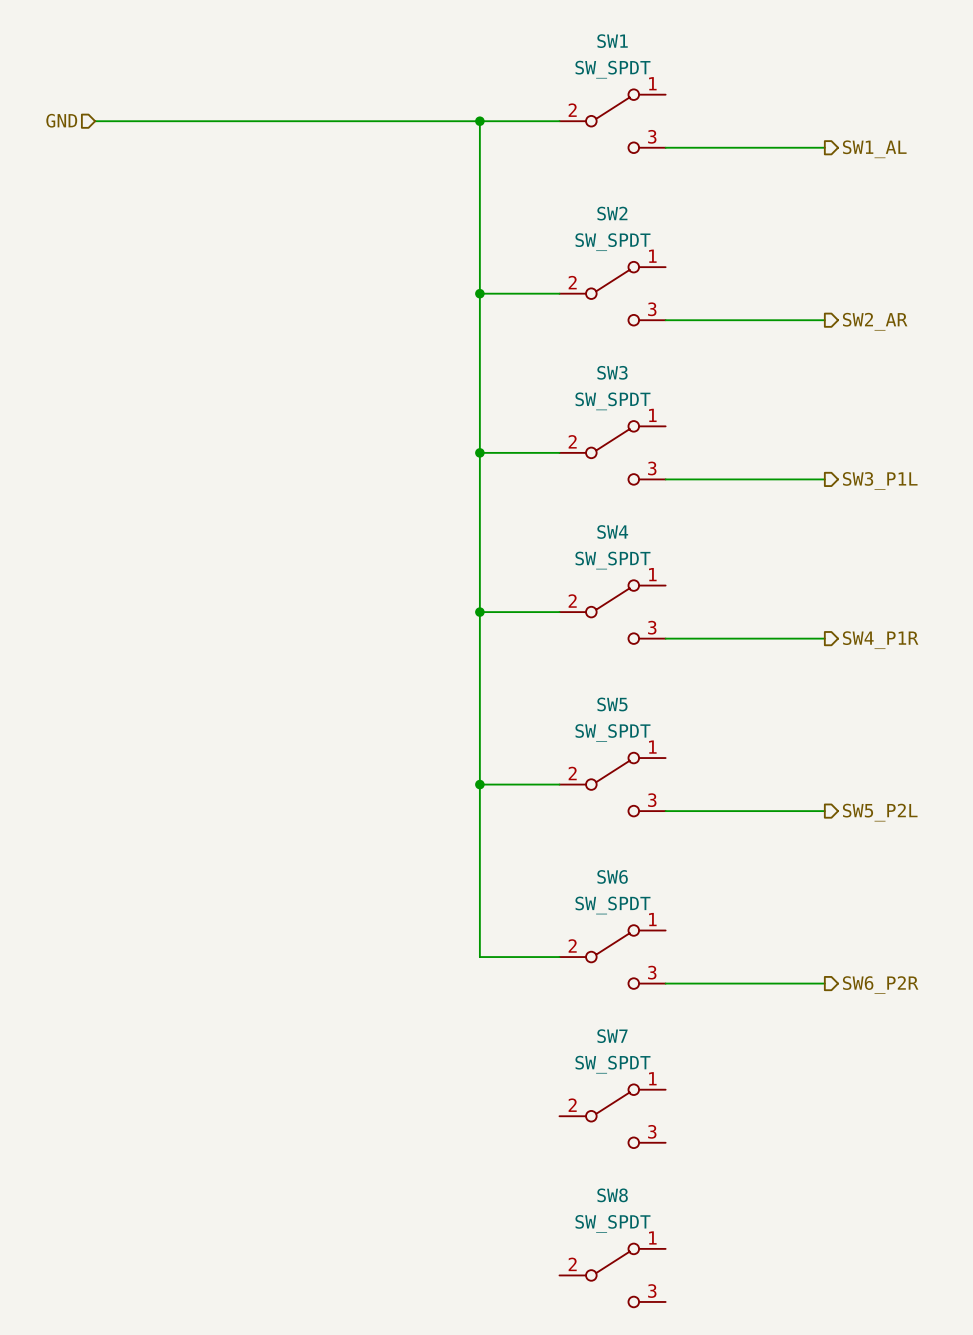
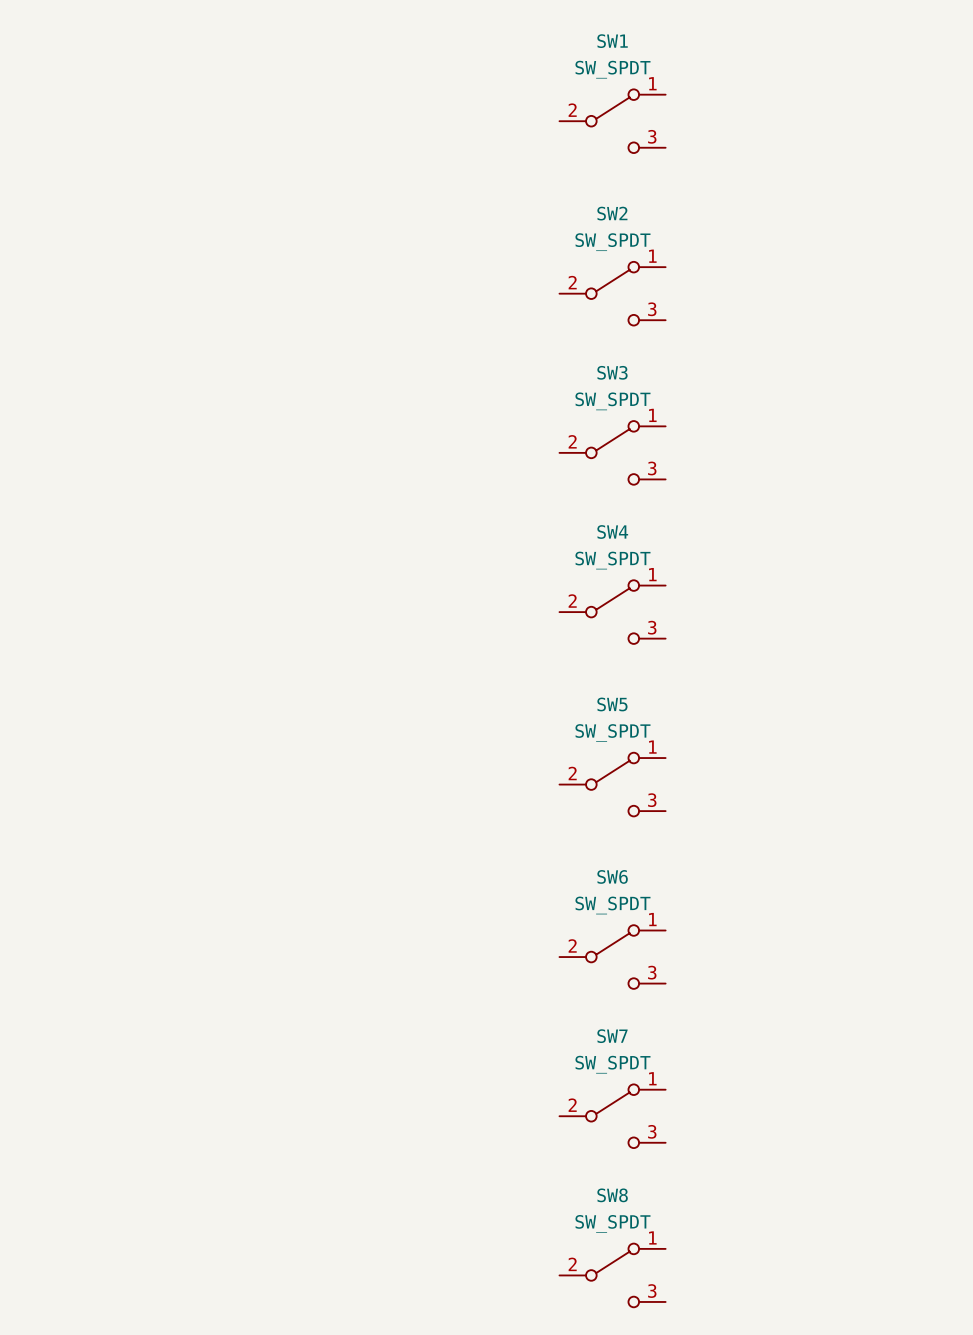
hierarchical label: GND (61, 120) -> none
wire: (95, 121) (559, 121) -> none
wire: (479, 121) (479, 957) (559, 957) -> none
junction: (479, 121) -> none
wire: (665, 147) (824, 147) -> none
hierarchical label: SW1_AL (874, 149) -> none
wire: (479, 293) (559, 293) -> none
junction: (479, 293) -> none
wire: (665, 320) (824, 320) -> none
hierarchical label: SW2_AR (875, 321) -> none
wire: (479, 452) (559, 452) -> none
junction: (479, 452) -> none
wire: (665, 479) (824, 479) -> none
hierarchical label: SW3_P1L (880, 480) -> none
wire: (479, 612) (559, 612) -> none
junction: (479, 612) -> none
wire: (665, 638) (824, 638) -> none
hierarchical label: SW4_P1R (880, 640) -> none
wire: (479, 784) (559, 784) -> none
junction: (479, 784) -> none
wire: (665, 811) (824, 811) -> none
hierarchical label: SW5_P2L (880, 812) -> none
wire: (665, 983) (824, 983) -> none
hierarchical label: SW6_P2R (880, 985) -> none

